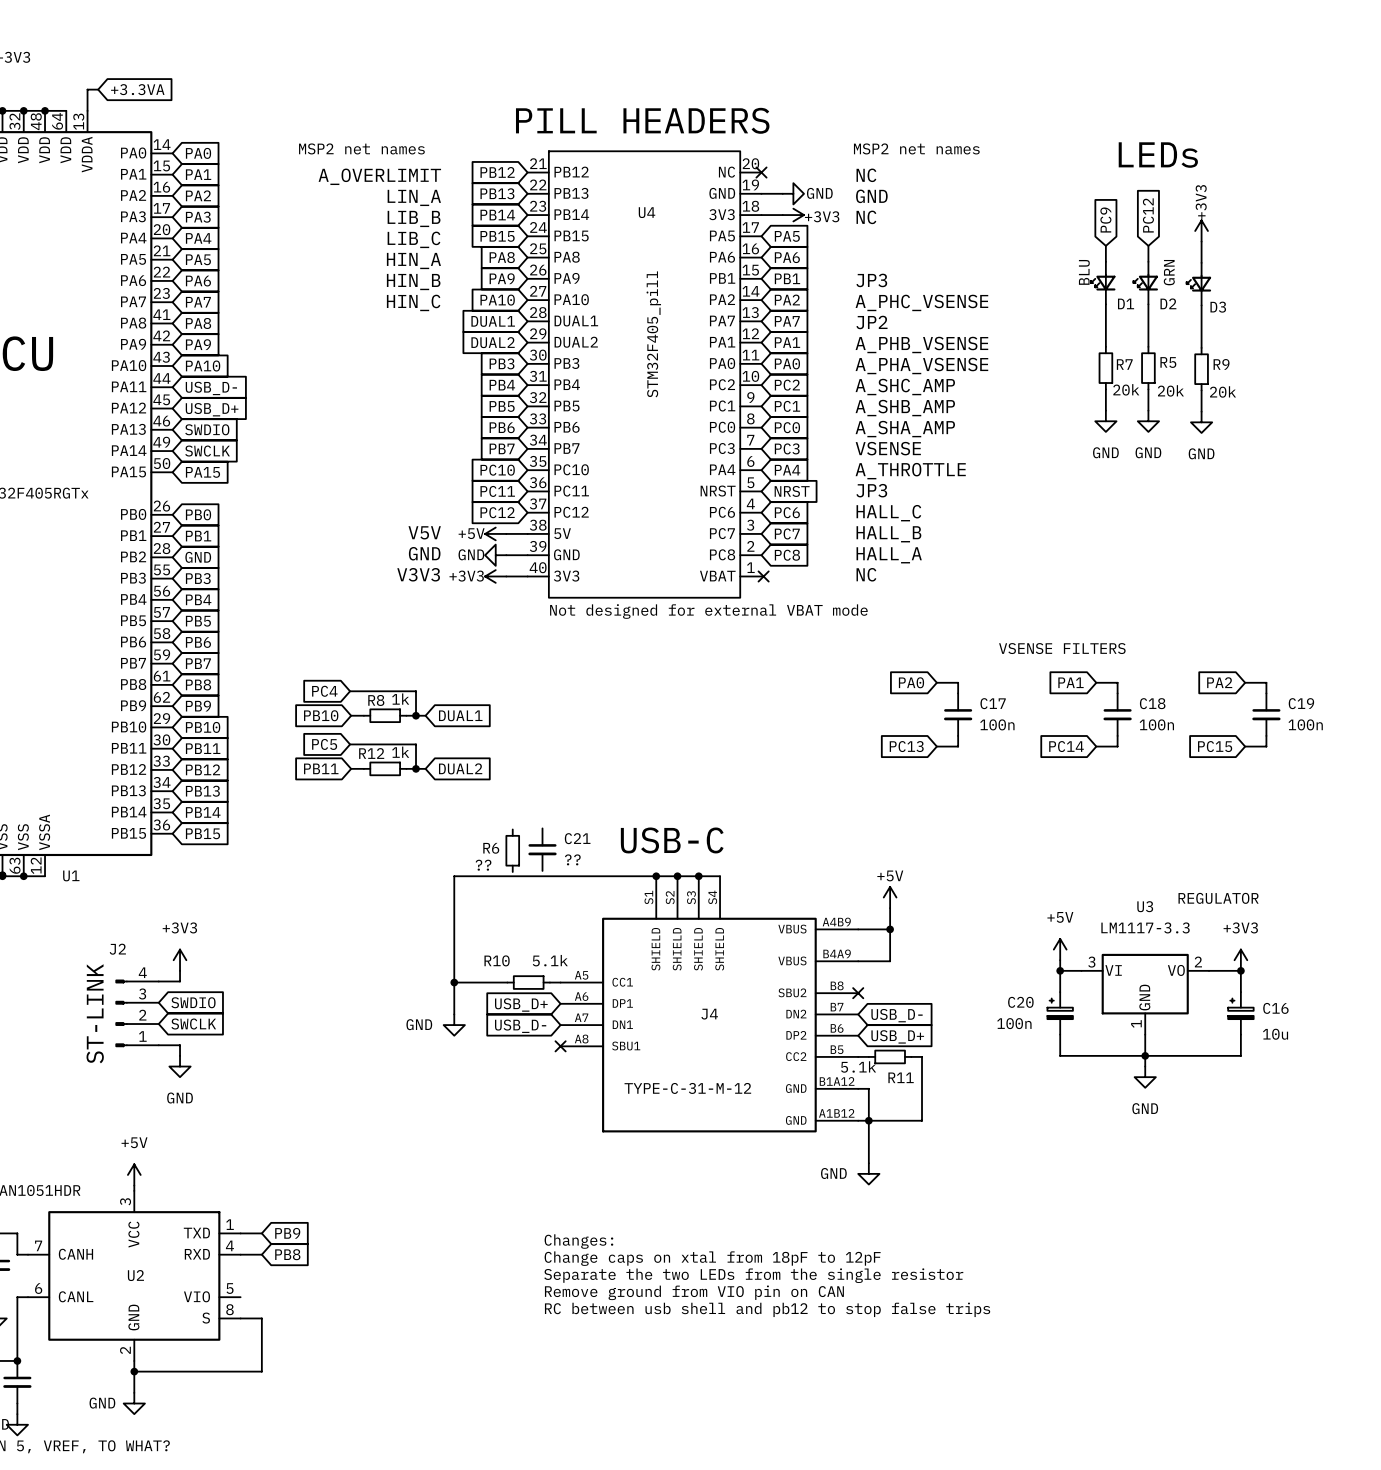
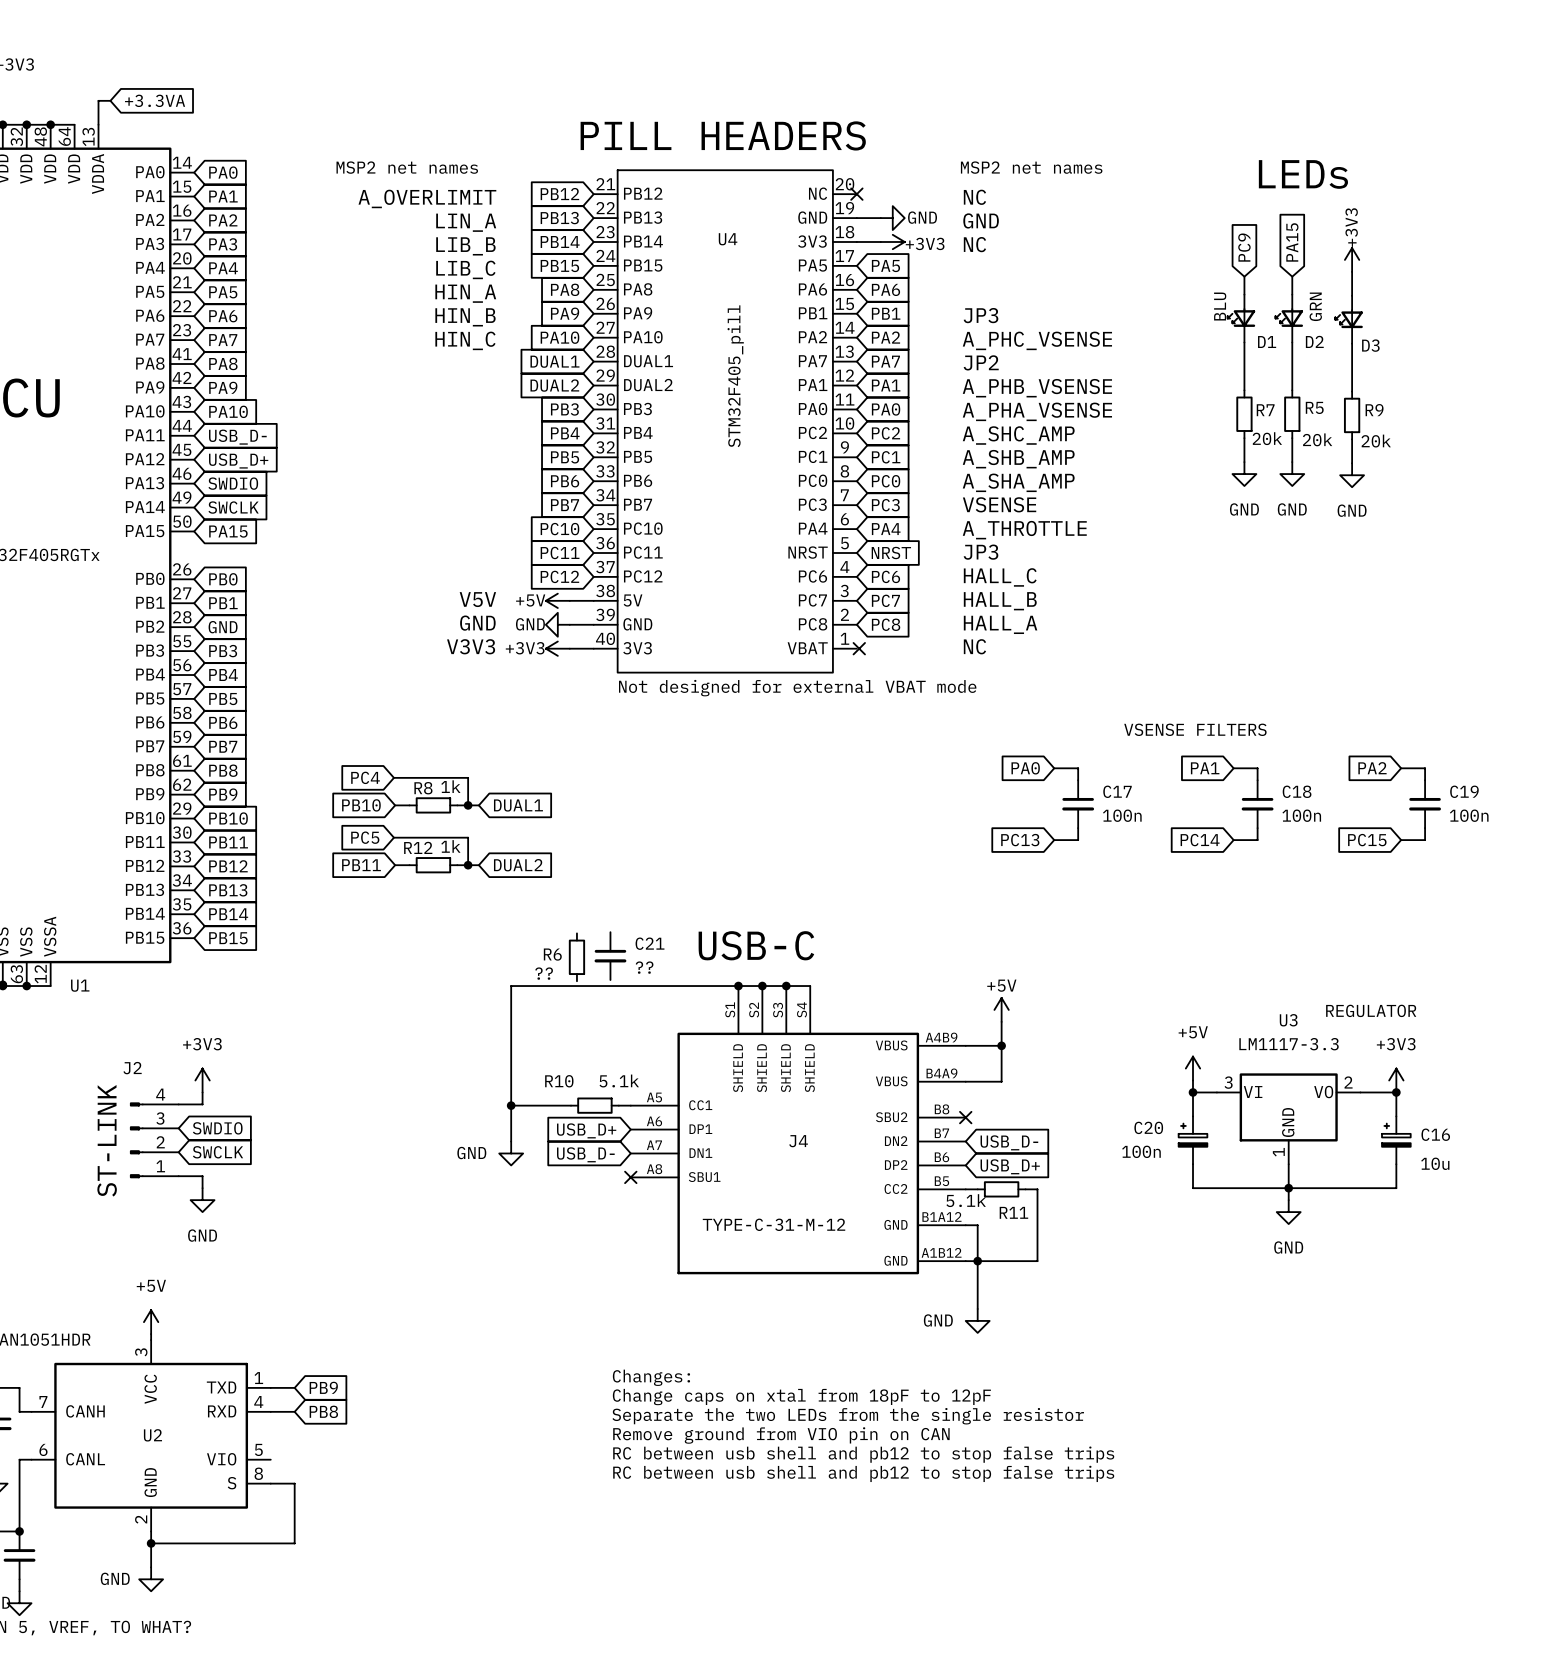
global label: PC12 (1148, 215) -> PA15 (1292, 242)
text: none -> Changes: (651, 1377)
text: Changes: (578, 1241) -> Change caps on xtal from 18pF to 12pF (801, 1397)
text: Change caps on xtal from 18pF to 12pF (712, 1258) -> Separate the two LEDs from the single resistor (848, 1416)
text: Separate the two LEDs from the single resistor (753, 1275) -> Remove ground from VIO pin on CAN (781, 1435)
text: Remove ground from VIO pin on CAN (694, 1292) -> RC between usb shell and pb12 to stop false trips (863, 1454)

